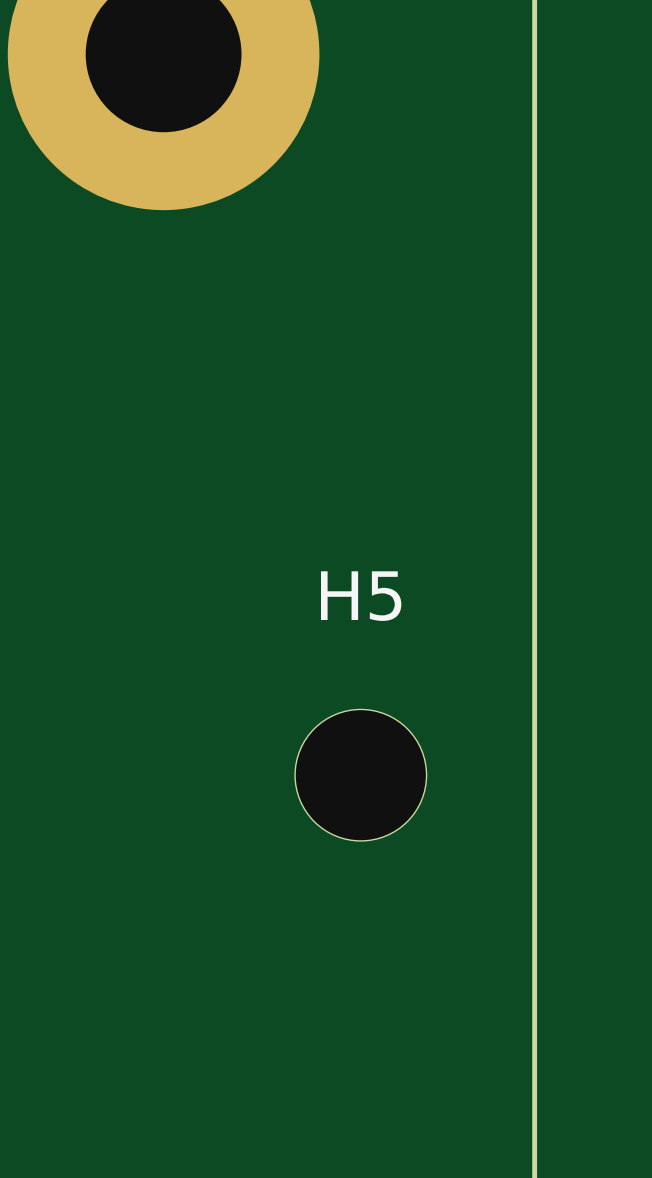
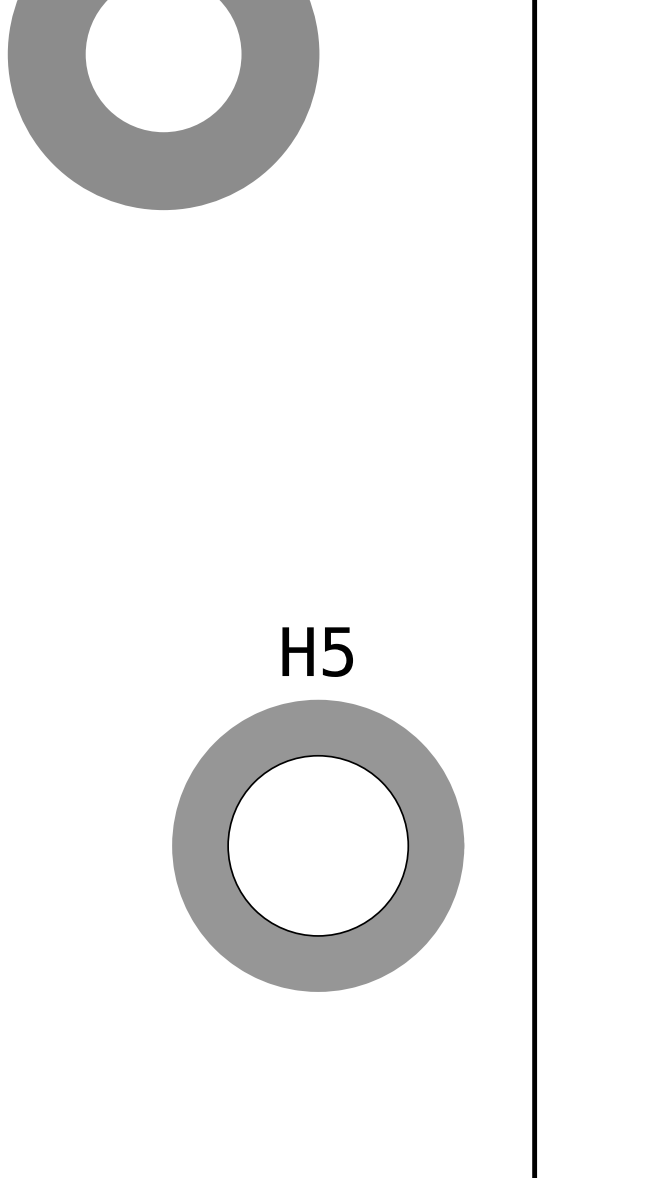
H5 footprint: [295, 709, 427, 841] -> [172, 699, 465, 992]

